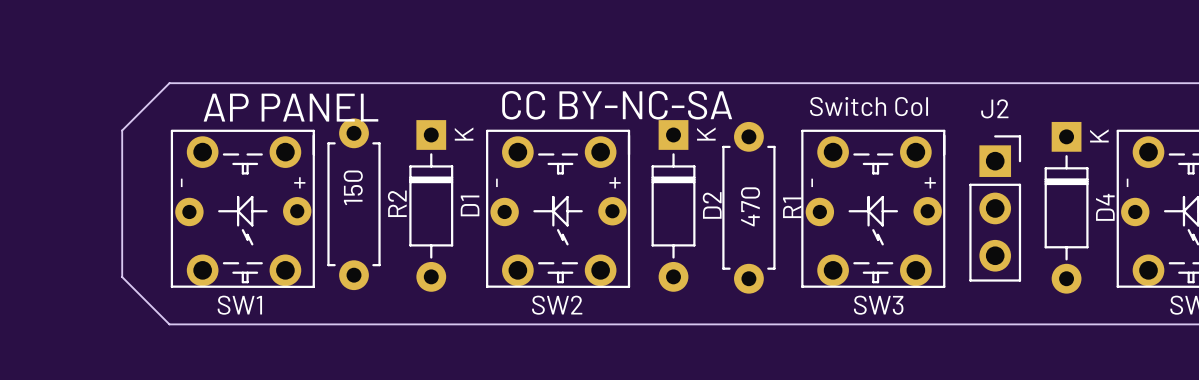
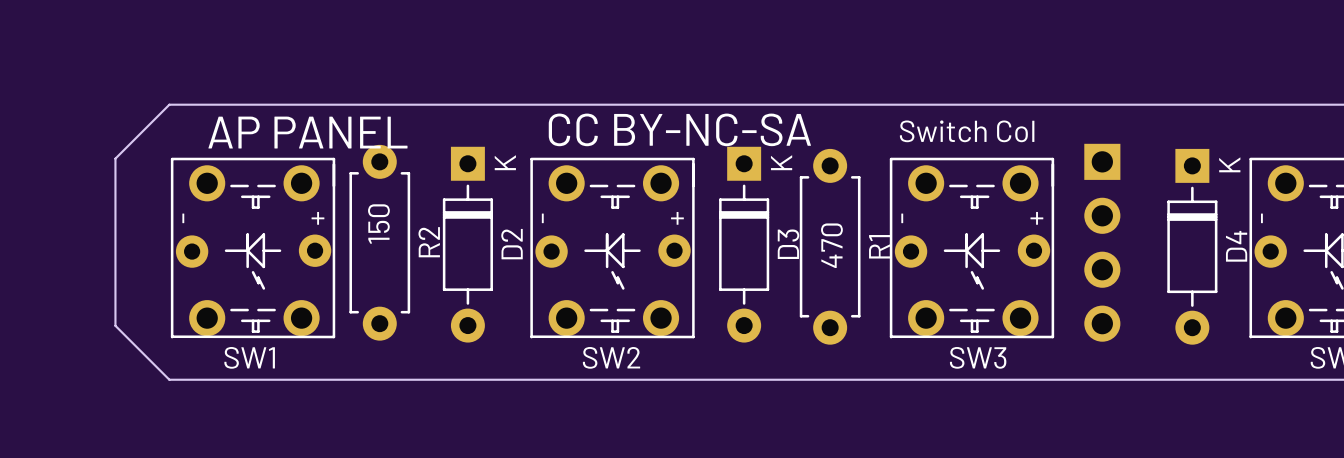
part: none -> (1102, 242)
D1 name: D1 (470, 205) -> D2 (512, 244)
D2 name: D2 (712, 205) -> D3 (788, 244)
J2: (995, 208) -> none

